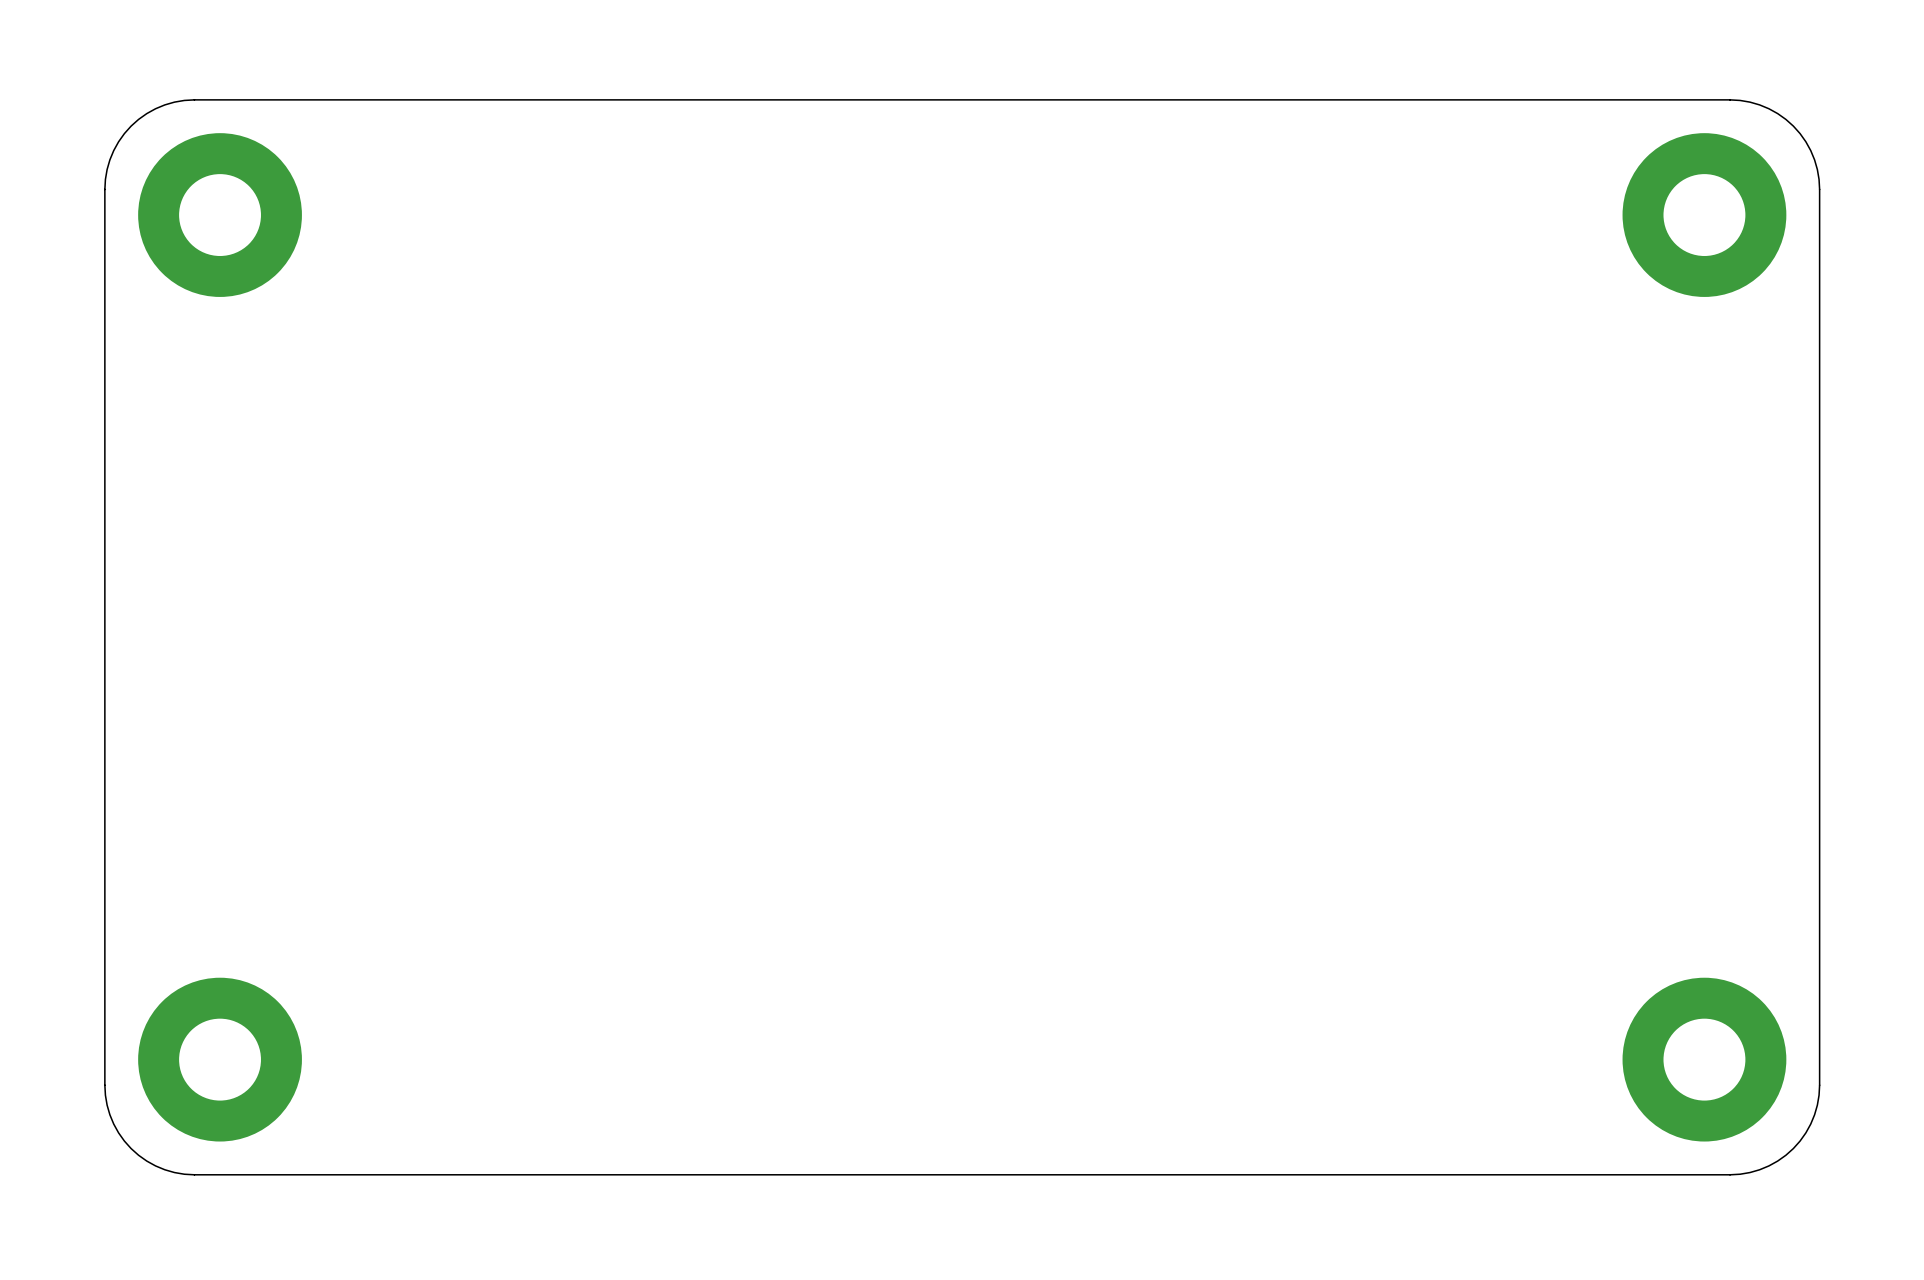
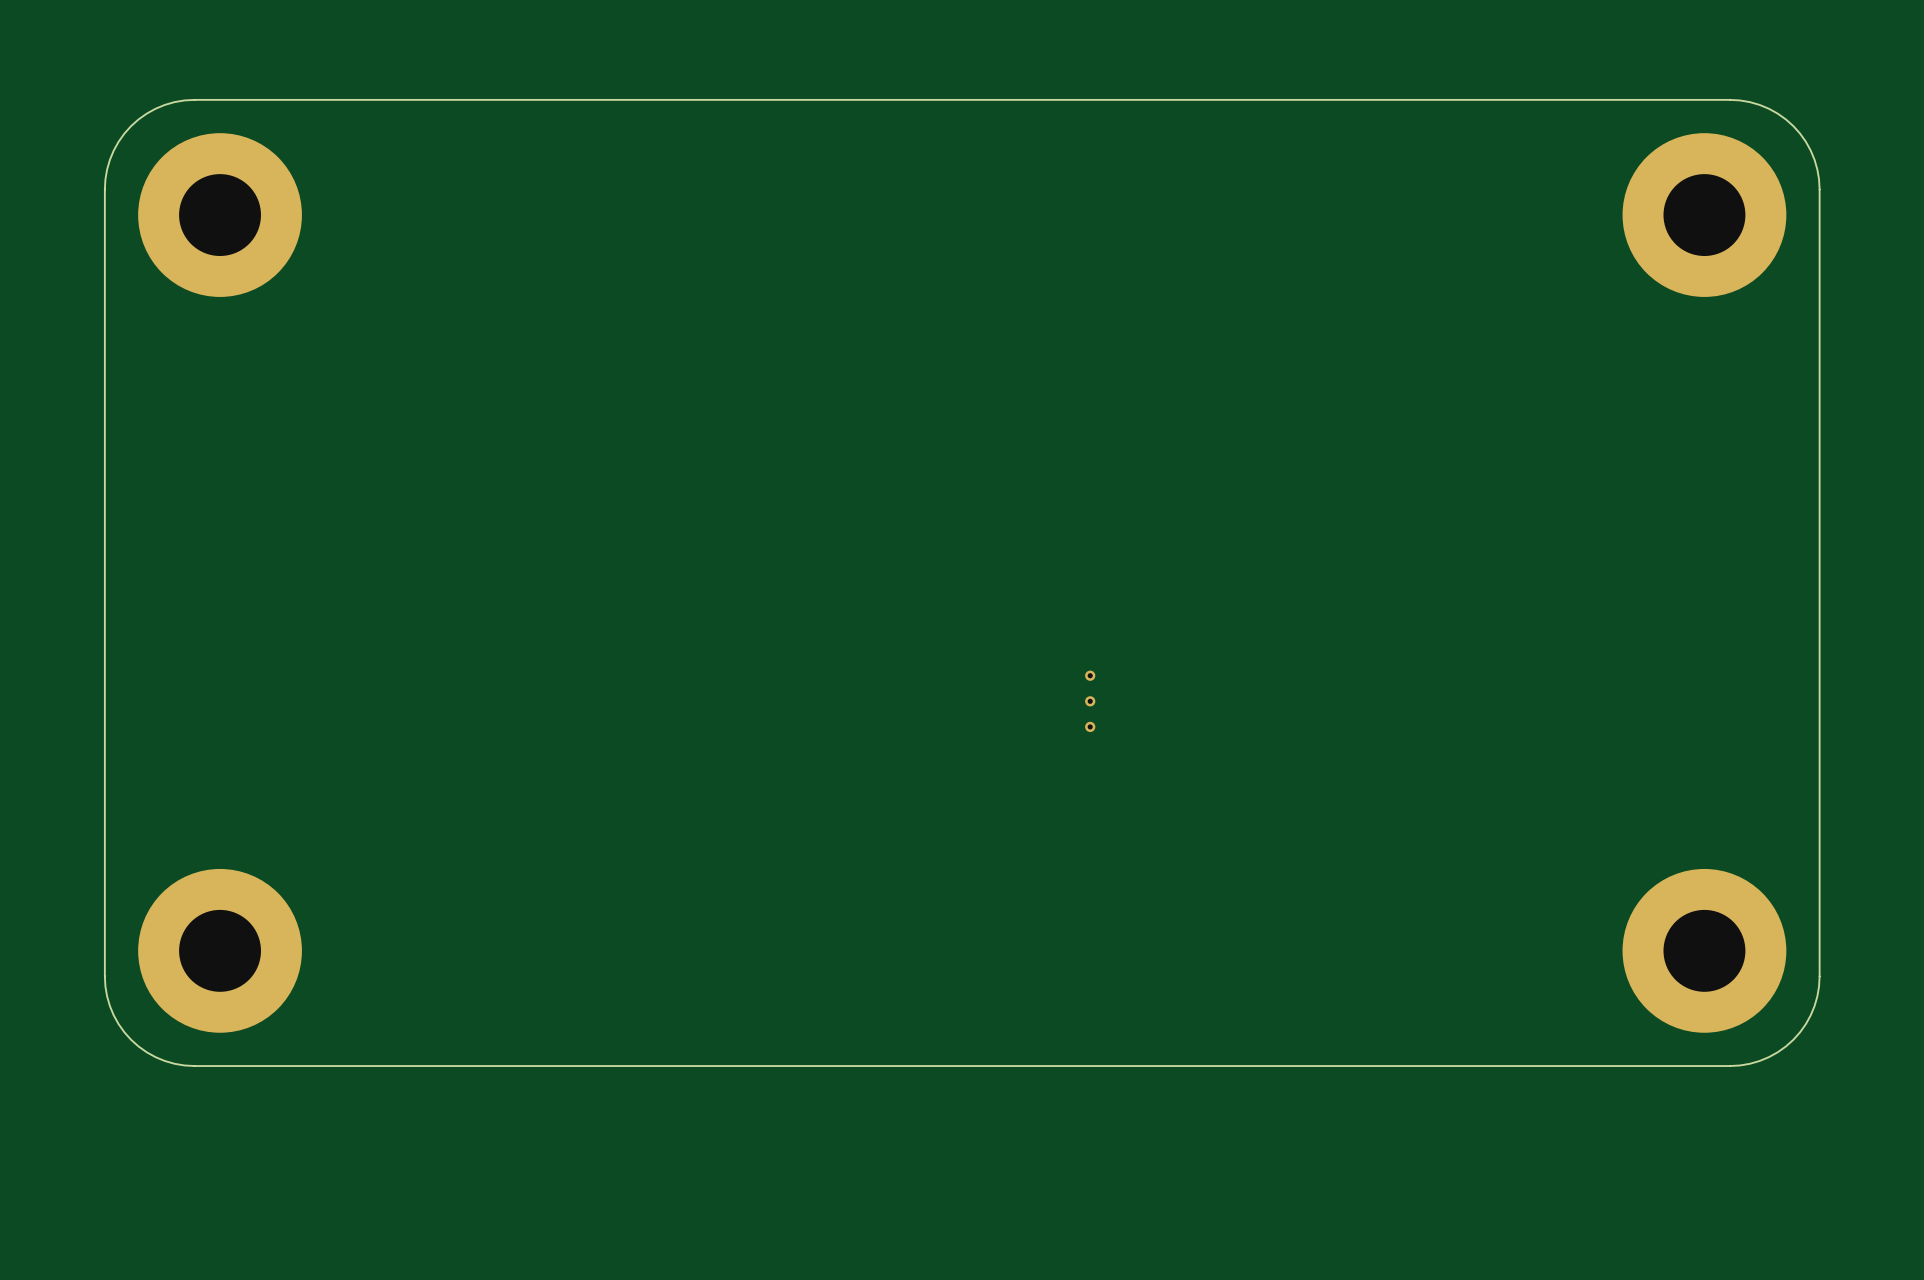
part: none -> (1090, 701)
board edge: (1819, 976) (1819, 1095) (1810, 1124) (1793, 1148) (1777, 1161) (1759, 1169) (1730, 1174) (184, 1174) (164, 1169) (138, 1155) (118, 1132) (109, 1114) (104, 1085) (104, 976) -> (1819, 976) (1817, 996) (1810, 1015) (1793, 1039) (1768, 1057) (1749, 1063) (1730, 1066) (194, 1066) (174, 1063) (155, 1057) (131, 1039) (118, 1024) (109, 1006) (104, 976)
part position: (220, 1059) -> (220, 950)
part position: (1704, 1059) -> (1704, 950)

